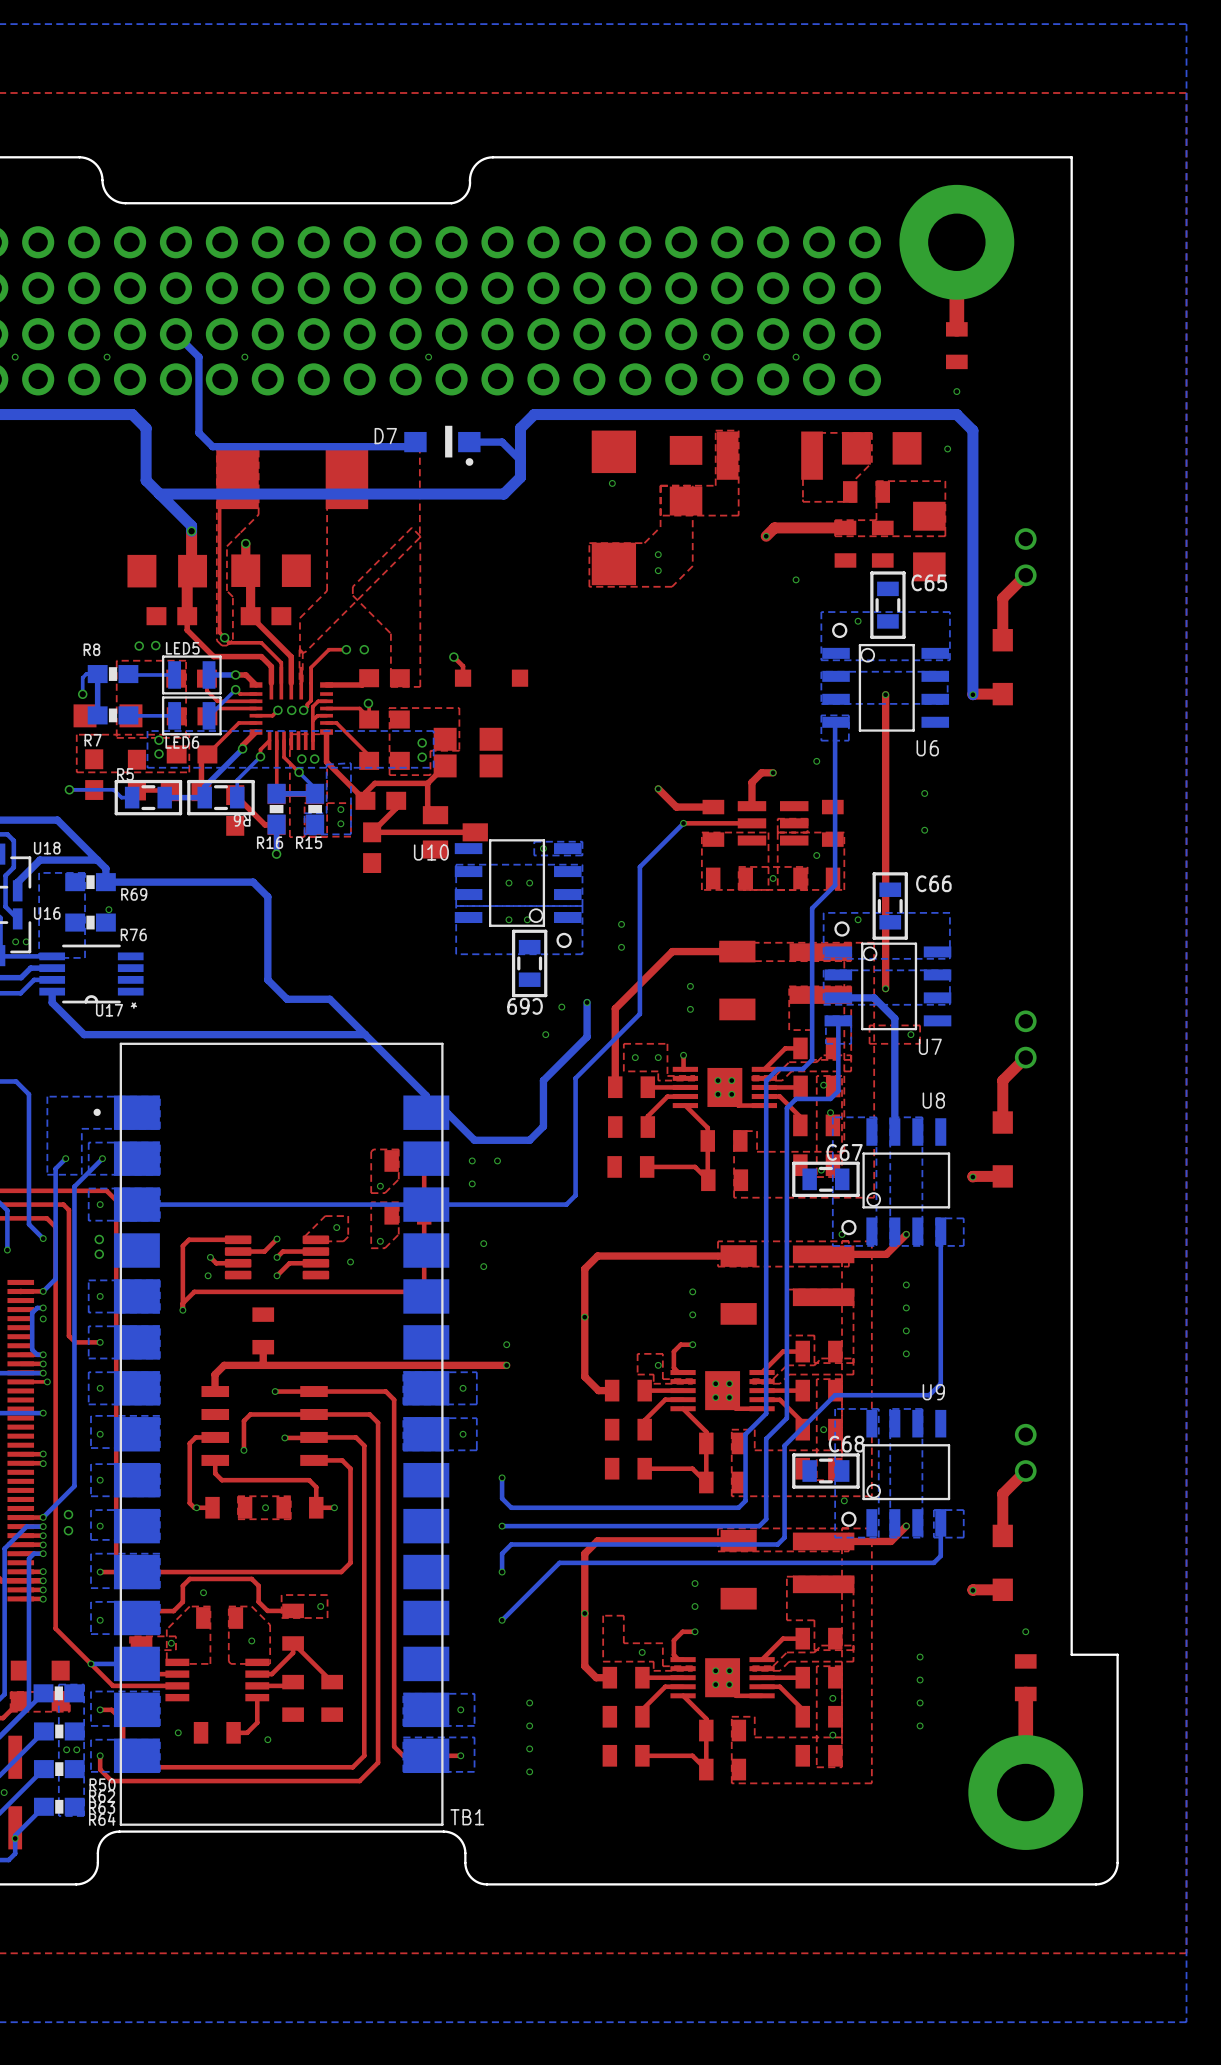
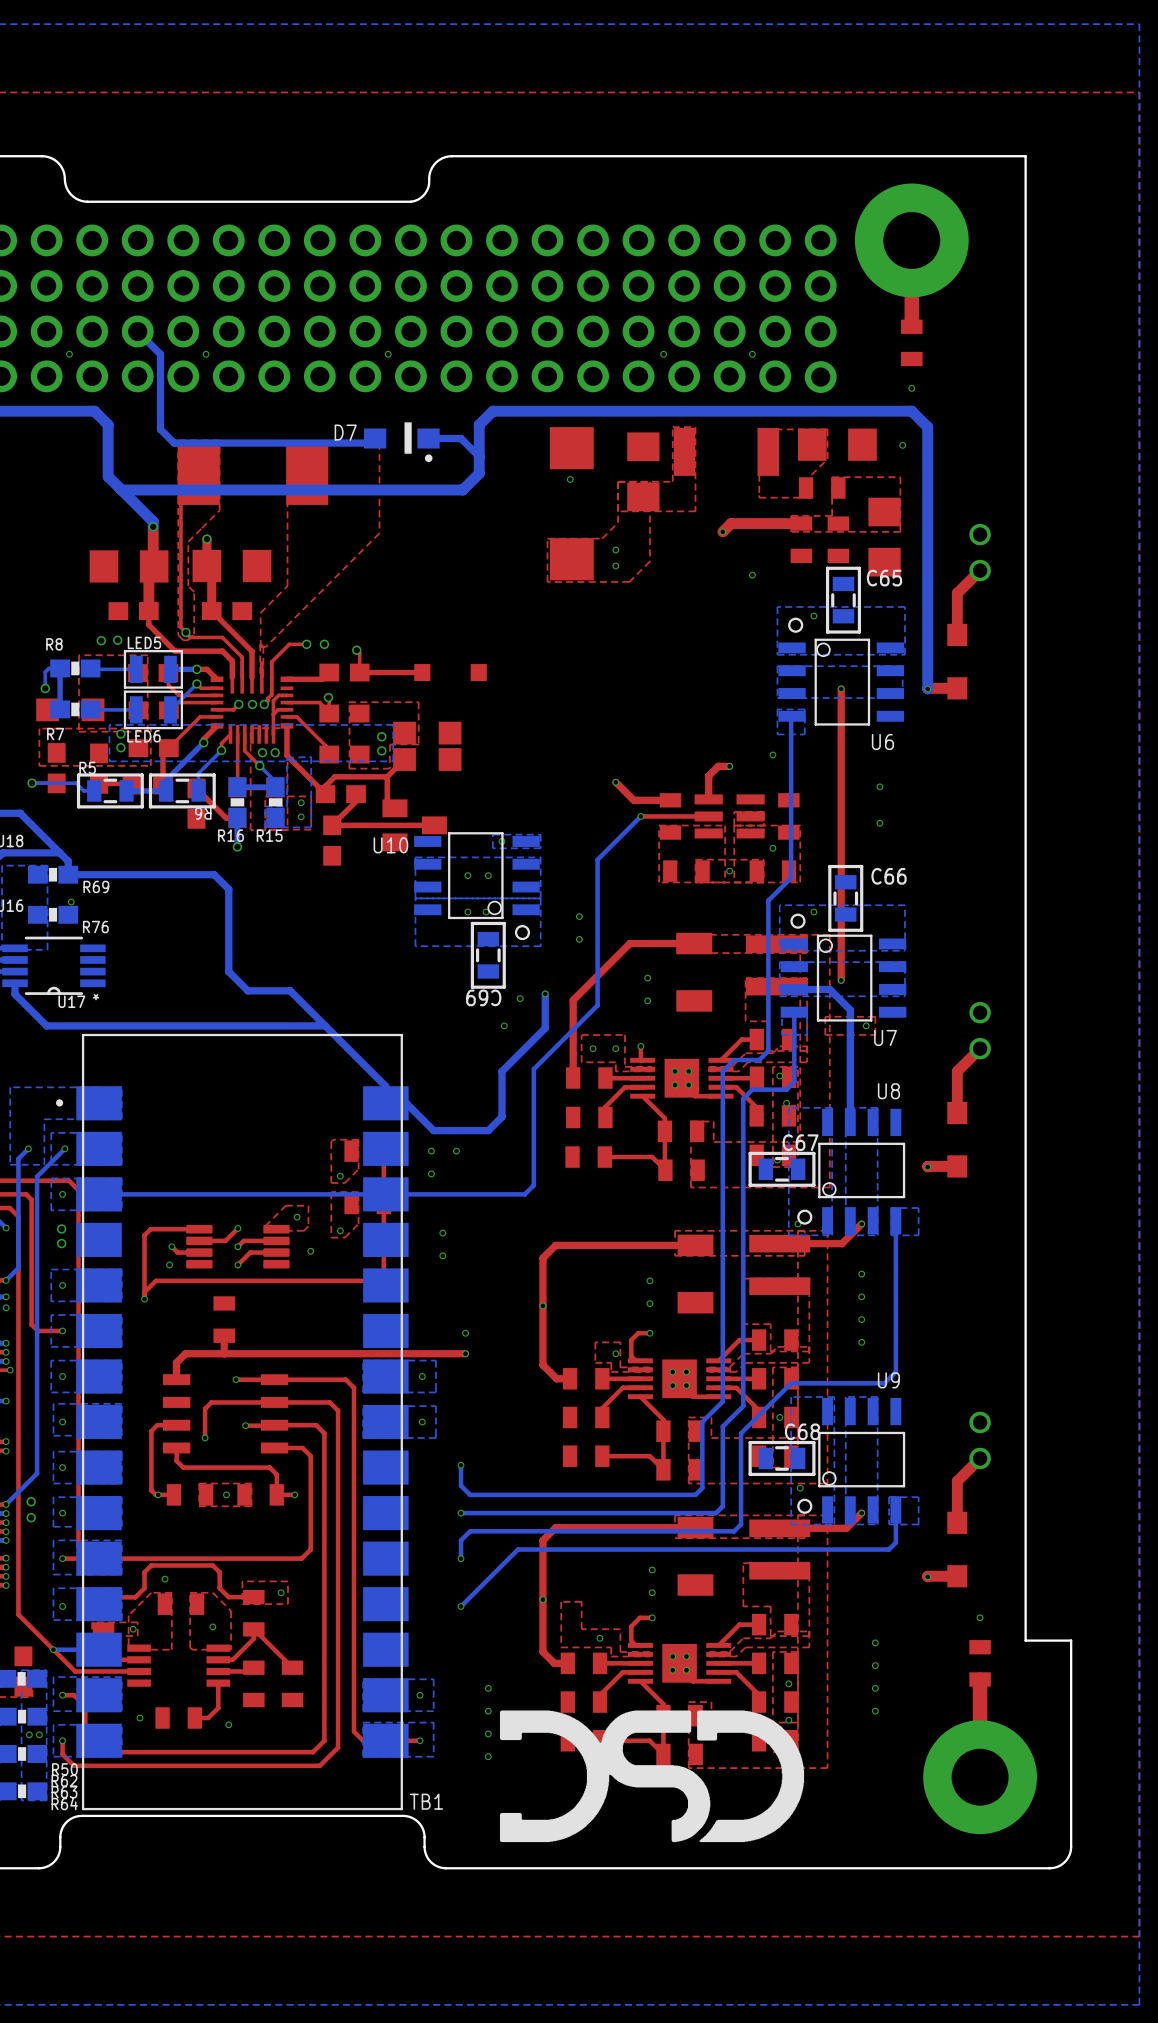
top zone outline: (411, 527) (420, 536) (420, 686) (390, 686) (390, 633) (352, 595) (352, 586) (411, 527) -> none
top track: (453, 657) (463, 666) (463, 678) -> (356, 650) (359, 653) (359, 672) (422, 672)
via position: (453, 657) -> (356, 650)
drawing: none -> [499, 1710, 805, 1843]

